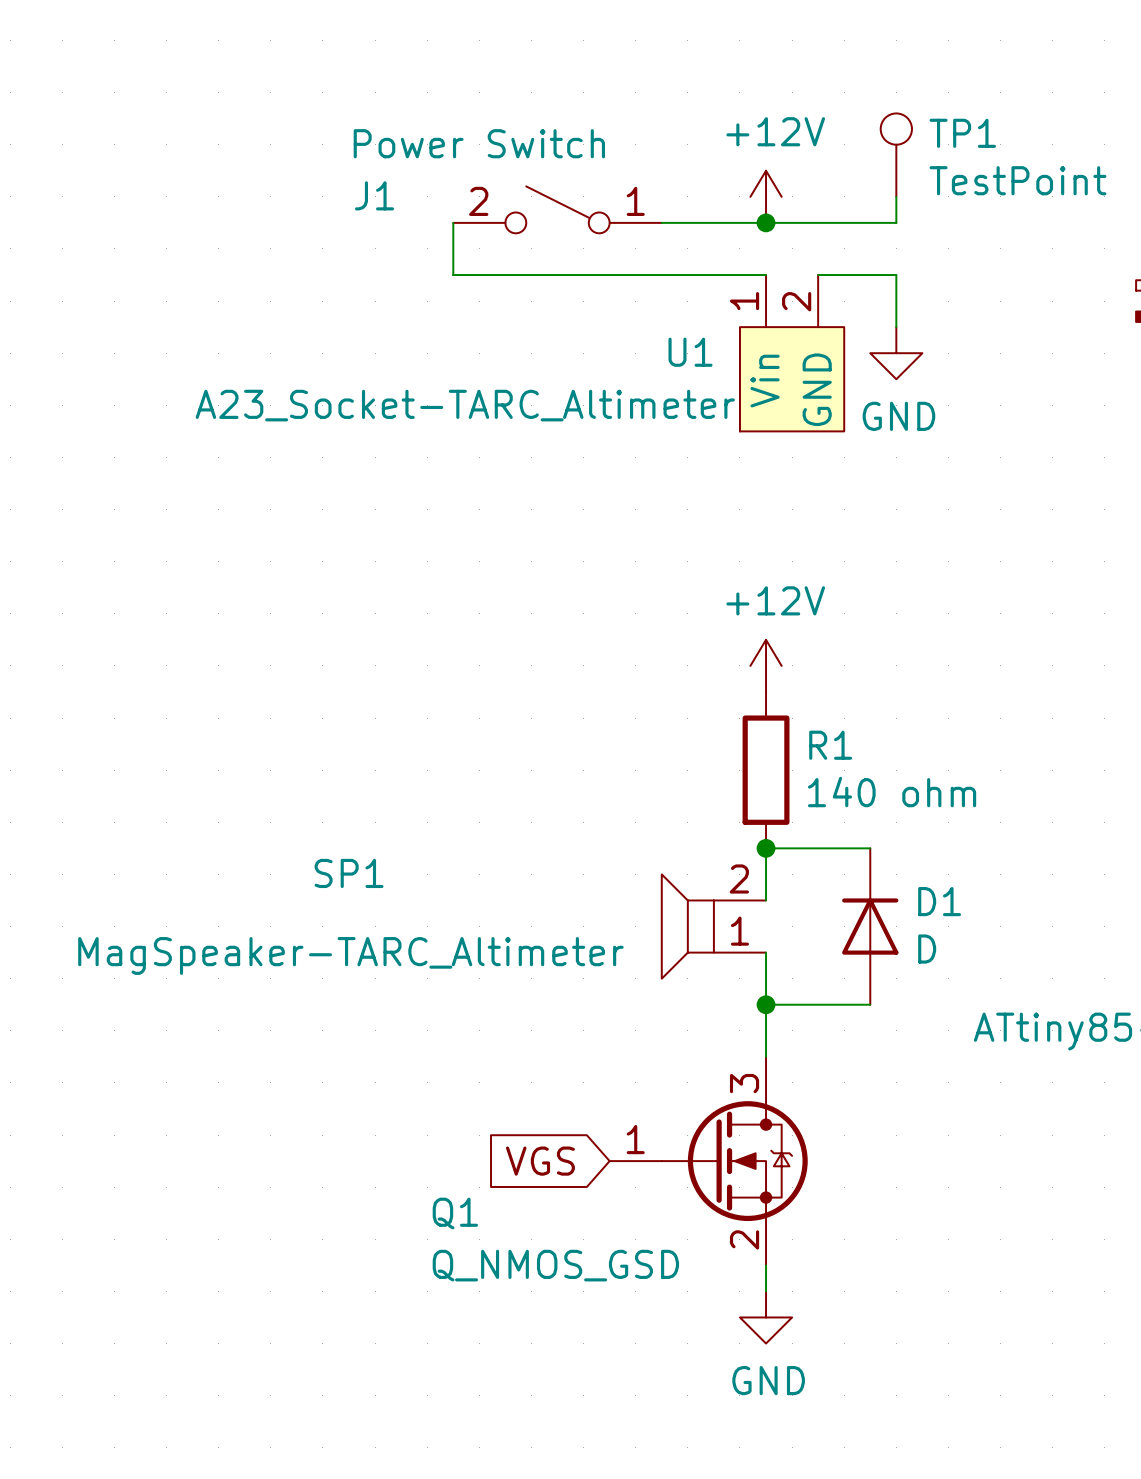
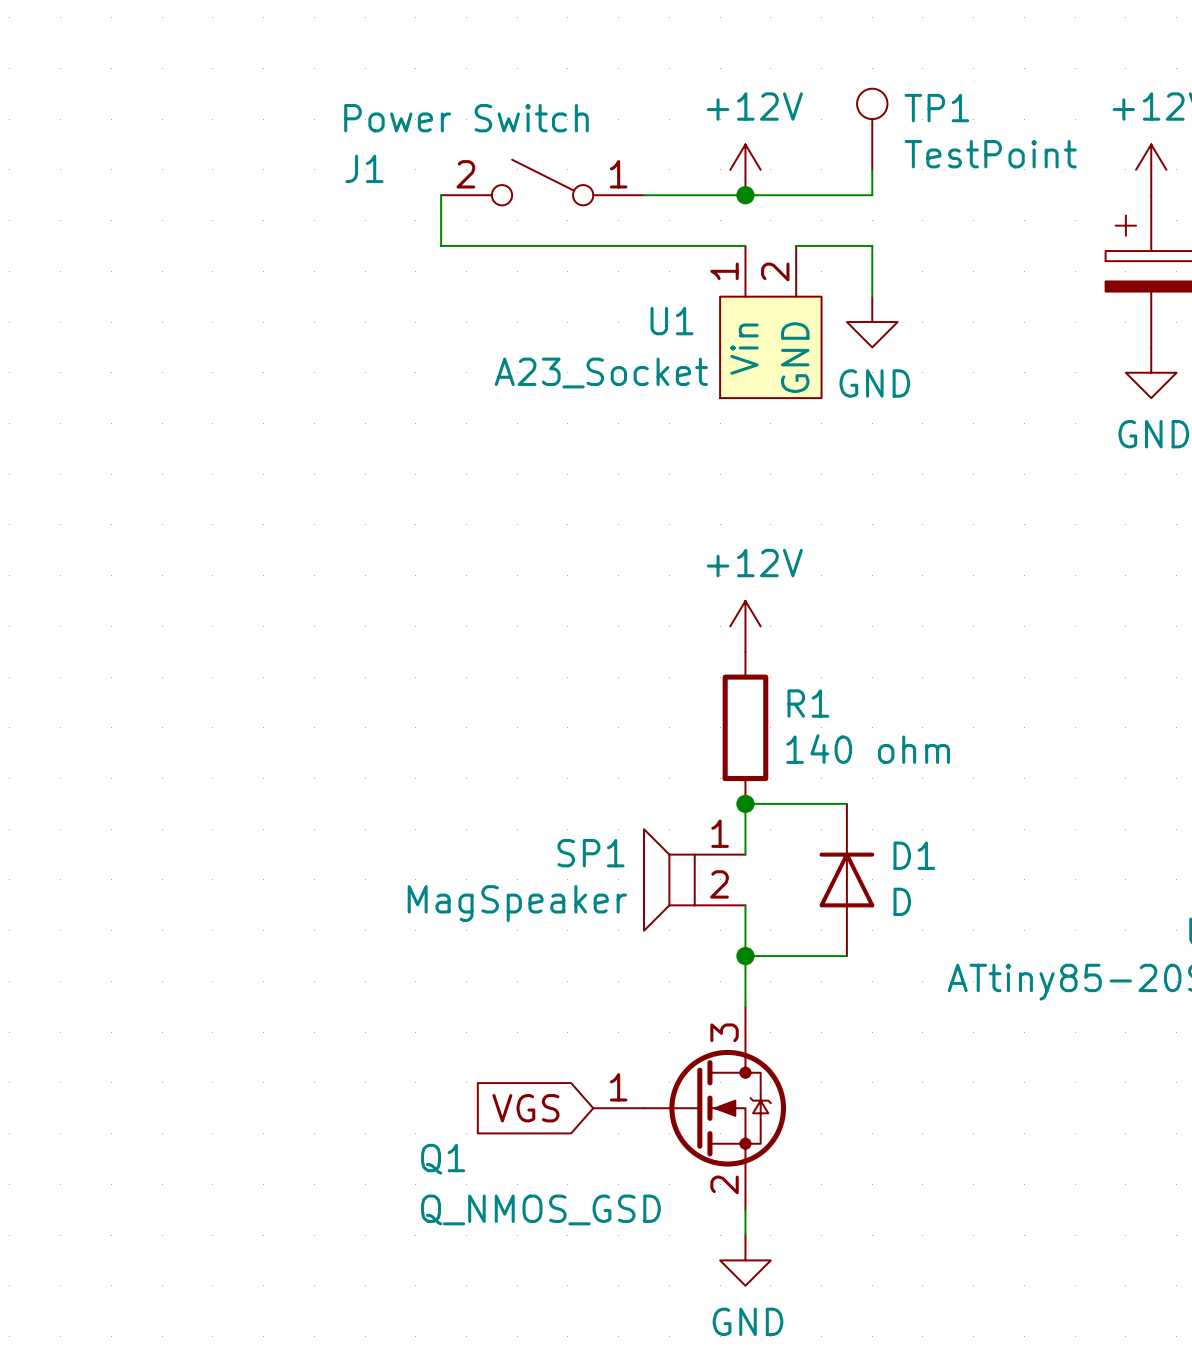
U1 value: A23_Socket-TARC_Altimeter (465, 405) -> A23_Socket (601, 373)
SP1 name position: SP1 (349, 873) -> SP1 (590, 853)
SP1 flip: as is (687, 926) -> up-down (669, 879)
SP1 value: MagSpeaker-TARC_Altimeter (350, 955) -> MagSpeaker (517, 903)

